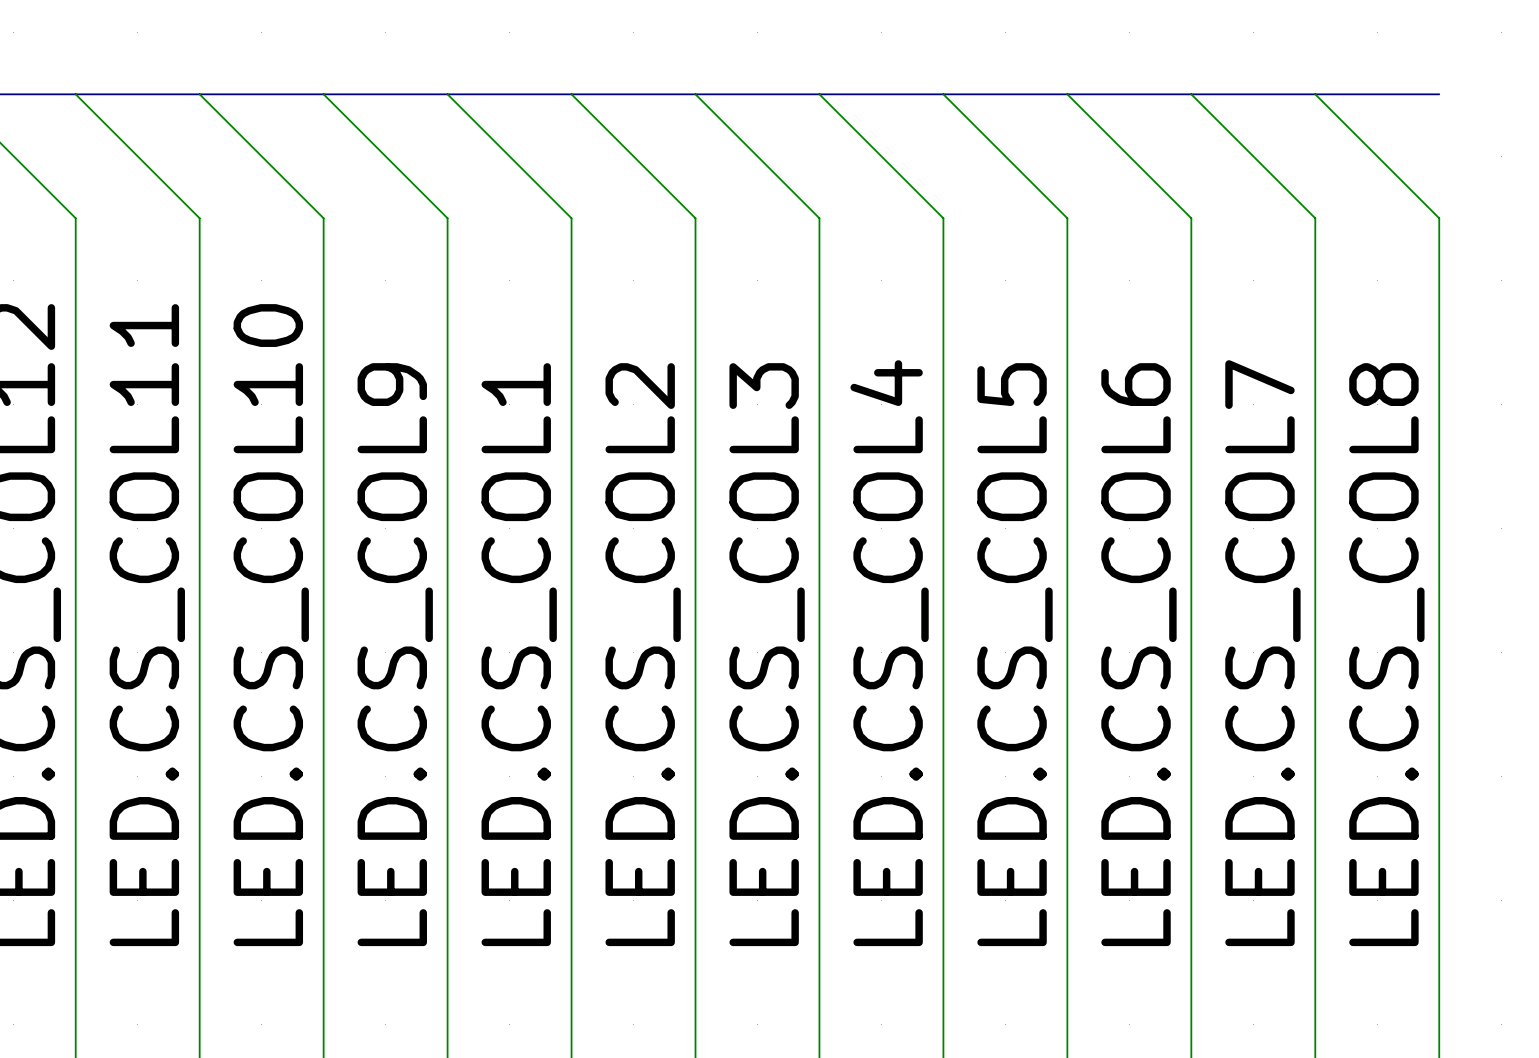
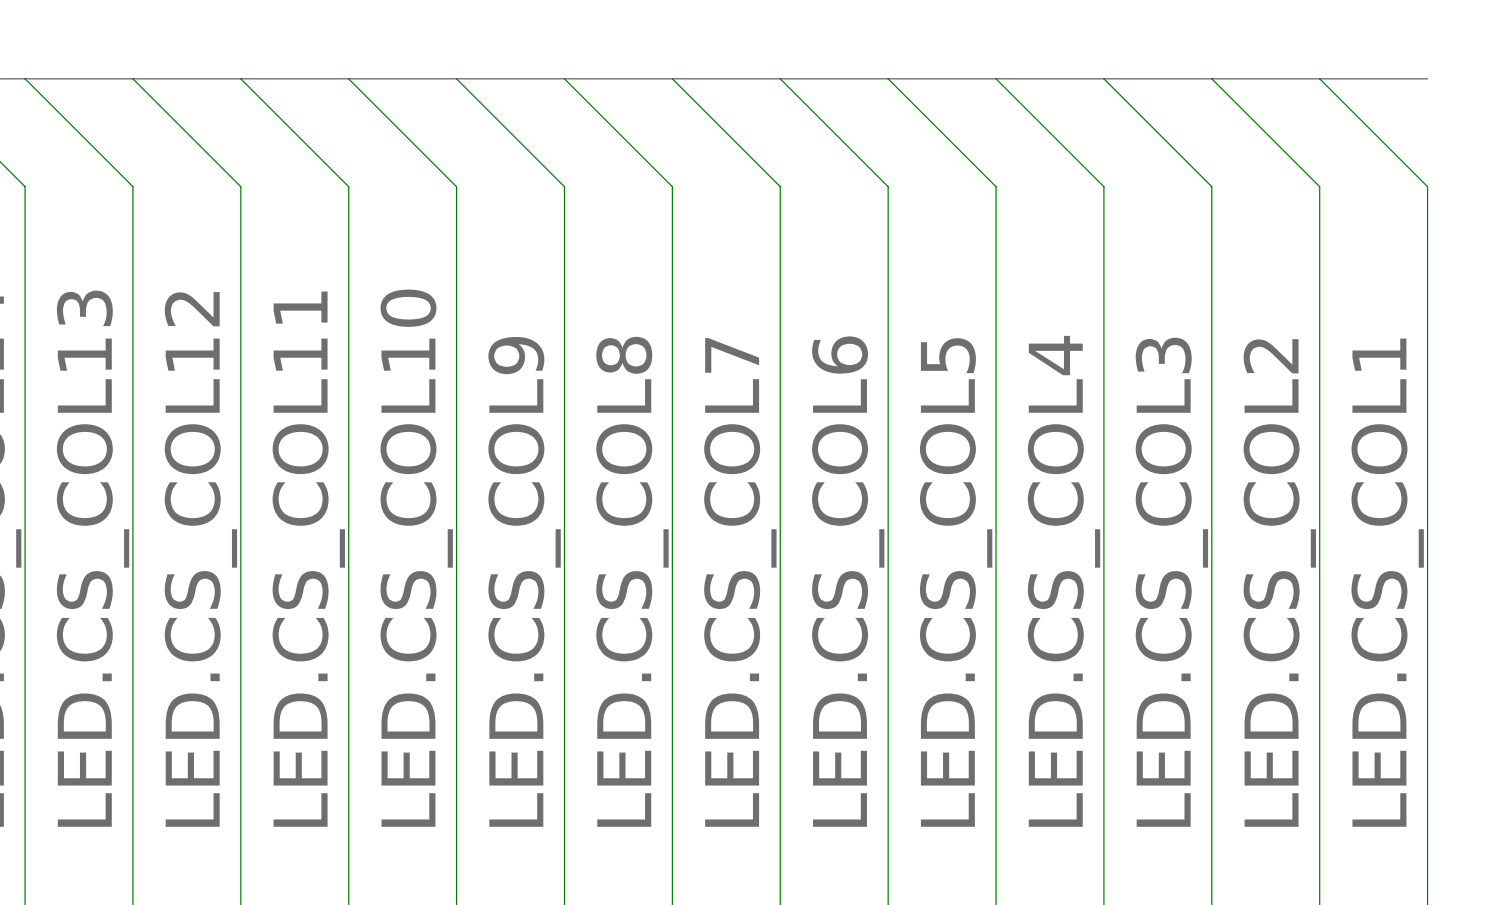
label: LED.CS_COL4 (889, 653) -> LED.CS_COL5 (956, 582)
label: LED.CS_COL7 (1262, 653) -> LED.CS_COL2 (1279, 582)
label: LED.CS_COL1 (519, 654) -> LED.CS_COL8 (632, 581)
label: LED.CS_COL2 (643, 654) -> LED.CS_COL7 (740, 582)
label: LED.CS_COL3 (767, 654) -> LED.CS_COL6 (848, 581)
label: LED.CS_COL5 (1015, 654) -> LED.CS_COL4 (1064, 581)
label: LED.CS_COL6 (1138, 654) -> LED.CS_COL3 (1171, 582)
label: LED.CS_COL8 (1386, 654) -> LED.CS_COL1 (1387, 582)

